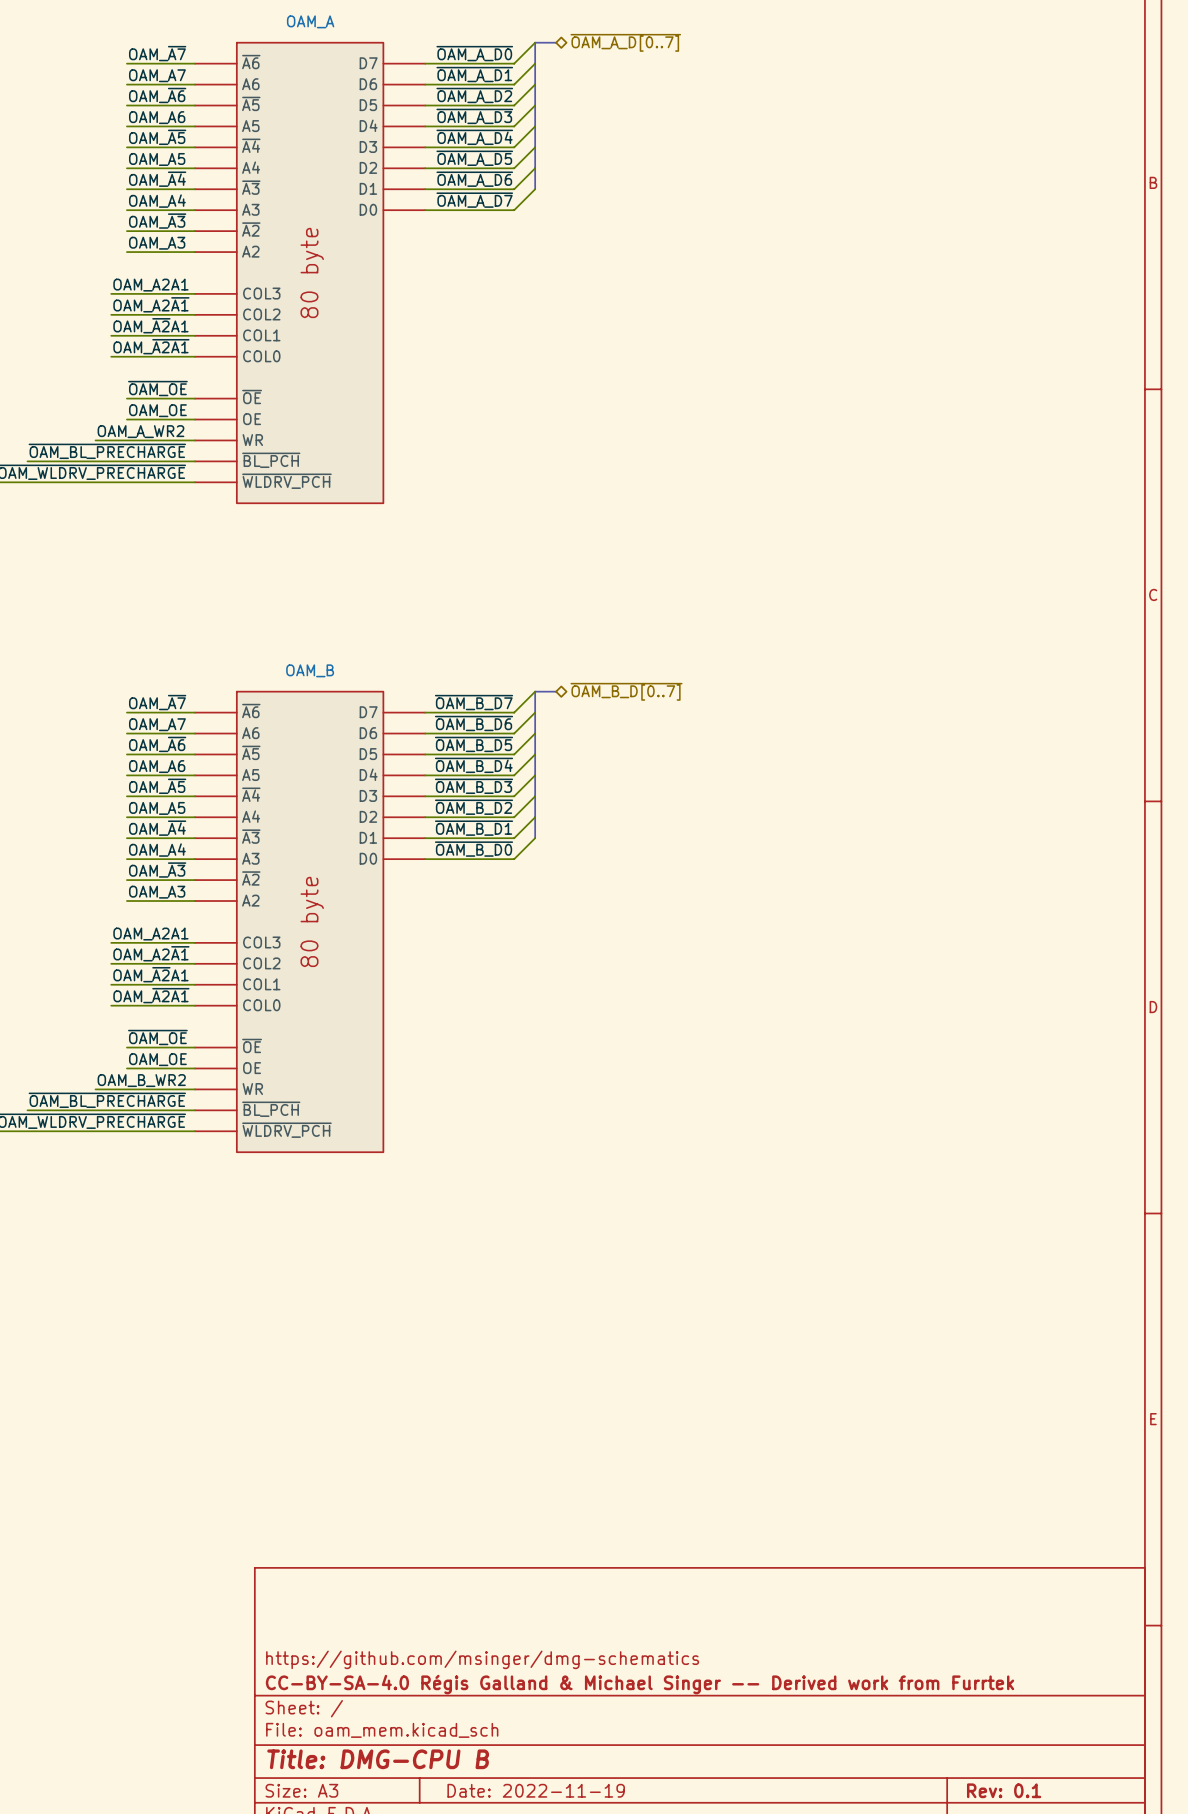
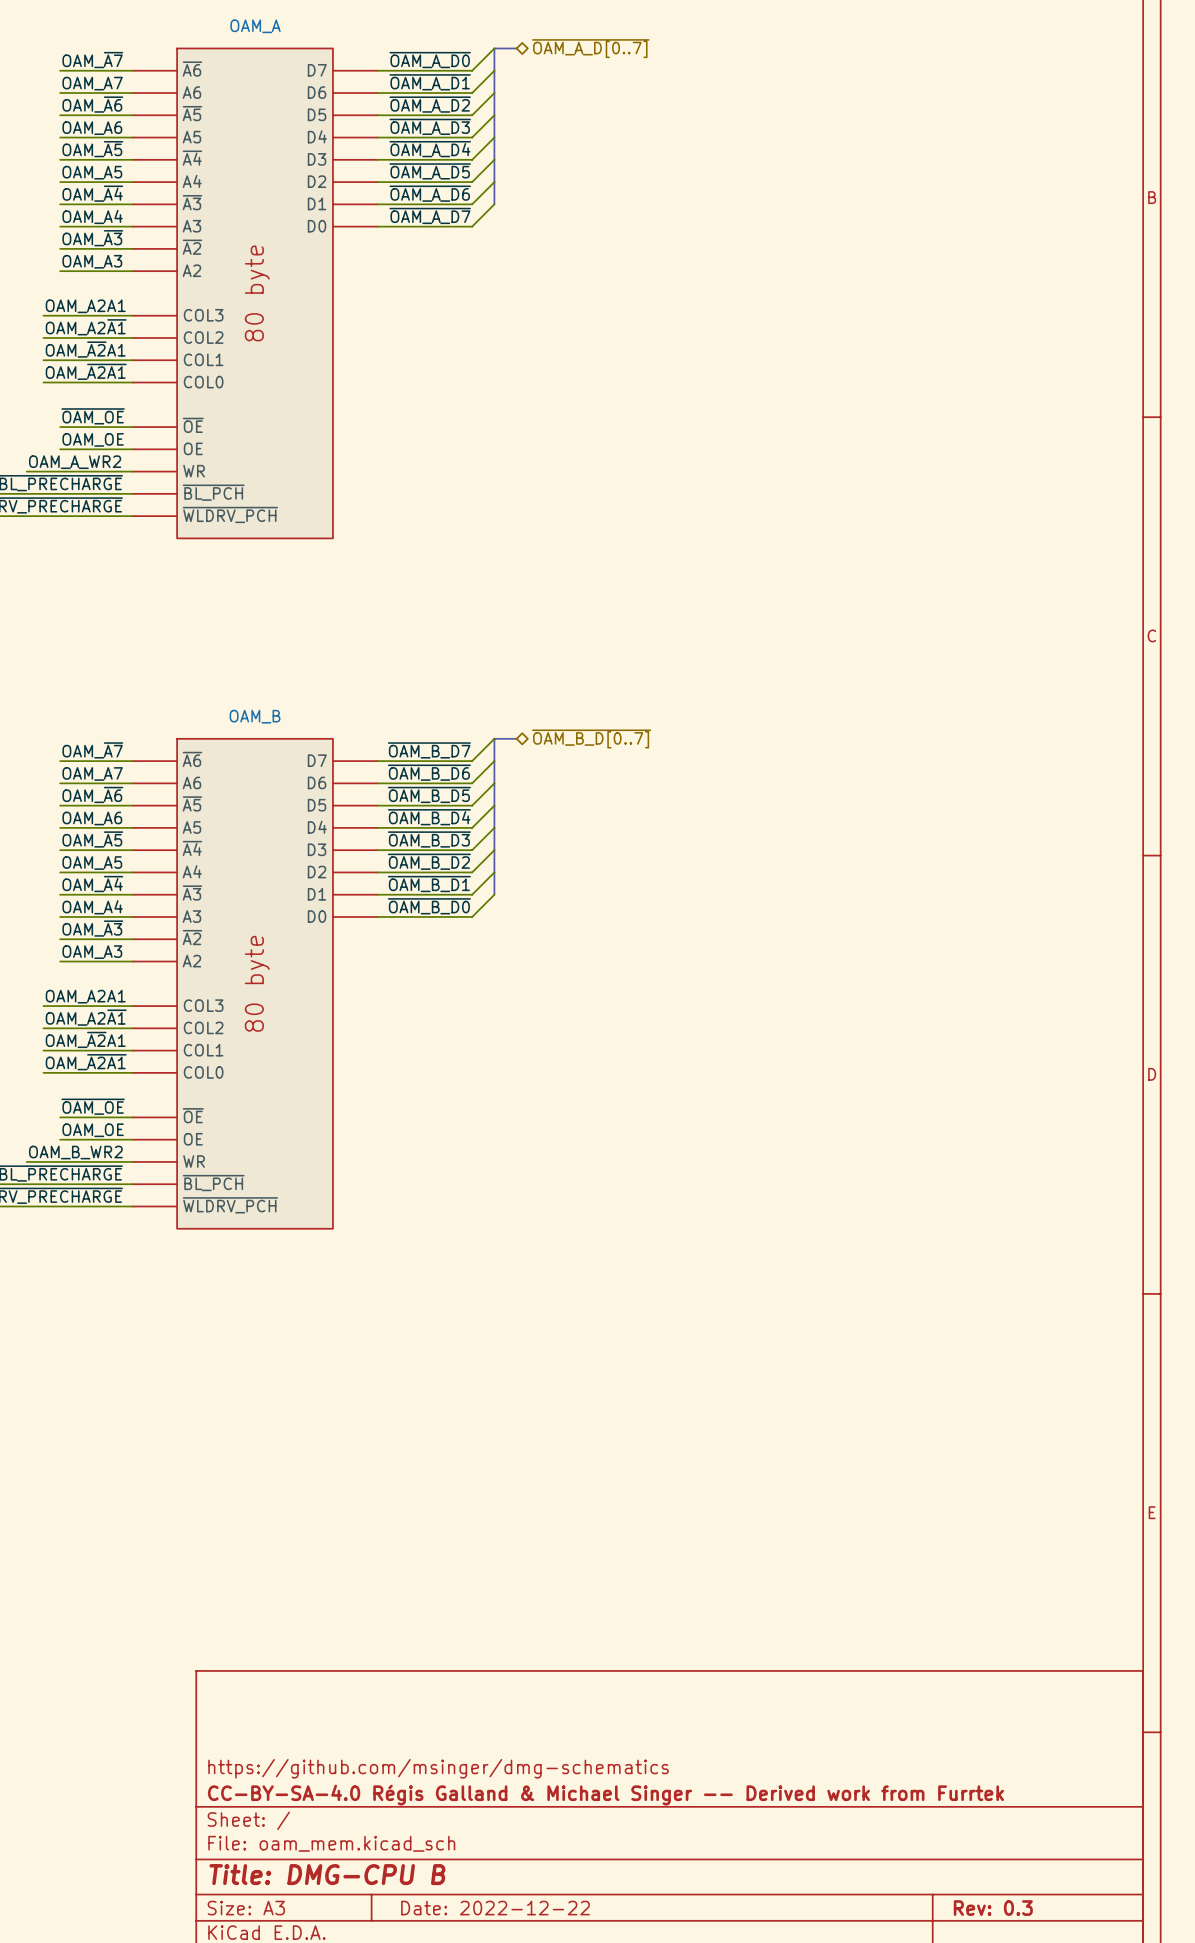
title block: Date: 2022-11-19 (536, 1790) -> Date: 2022-12-22 (495, 1908)
title block: Rev: 0.1 (1004, 1790) -> Rev: 0.3 (993, 1908)

